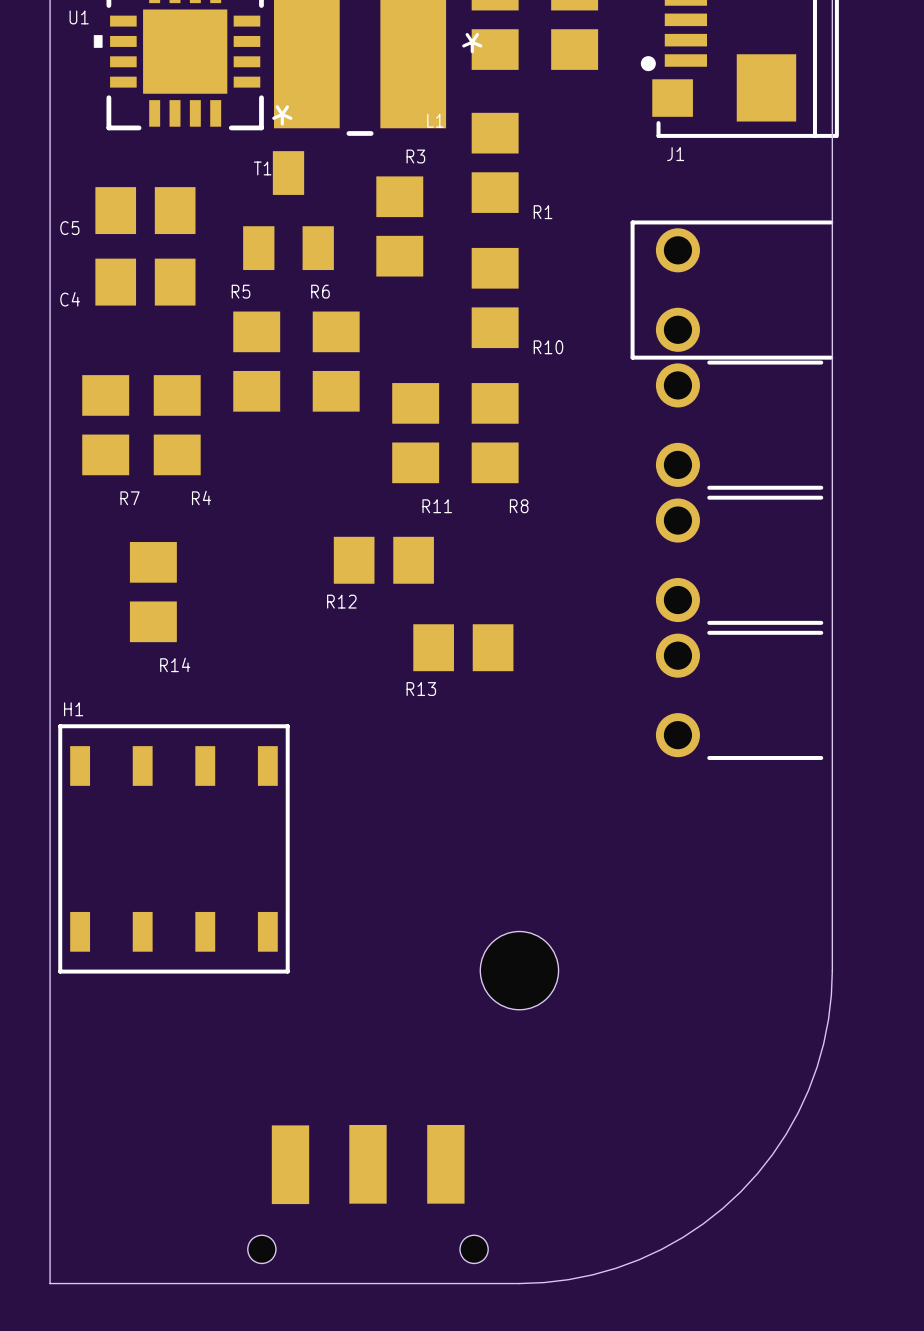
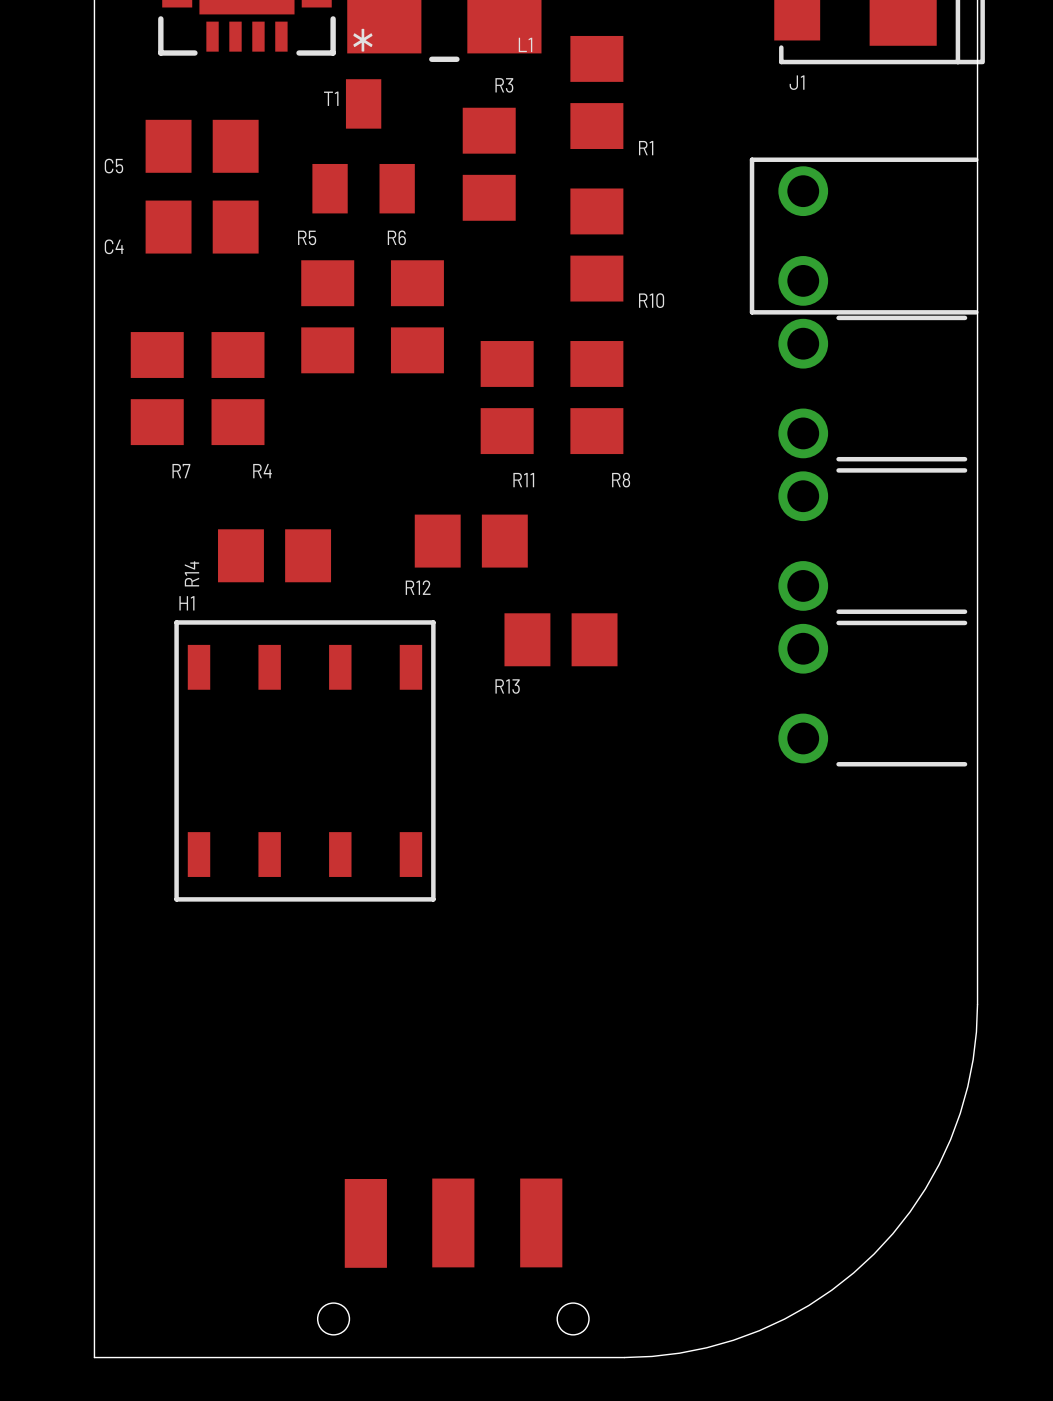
R14 rotation: 0° (153, 592) -> 90° clockwise (274, 555)
H1 position: (173, 848) -> (304, 760)
hole: (519, 970) -> none

